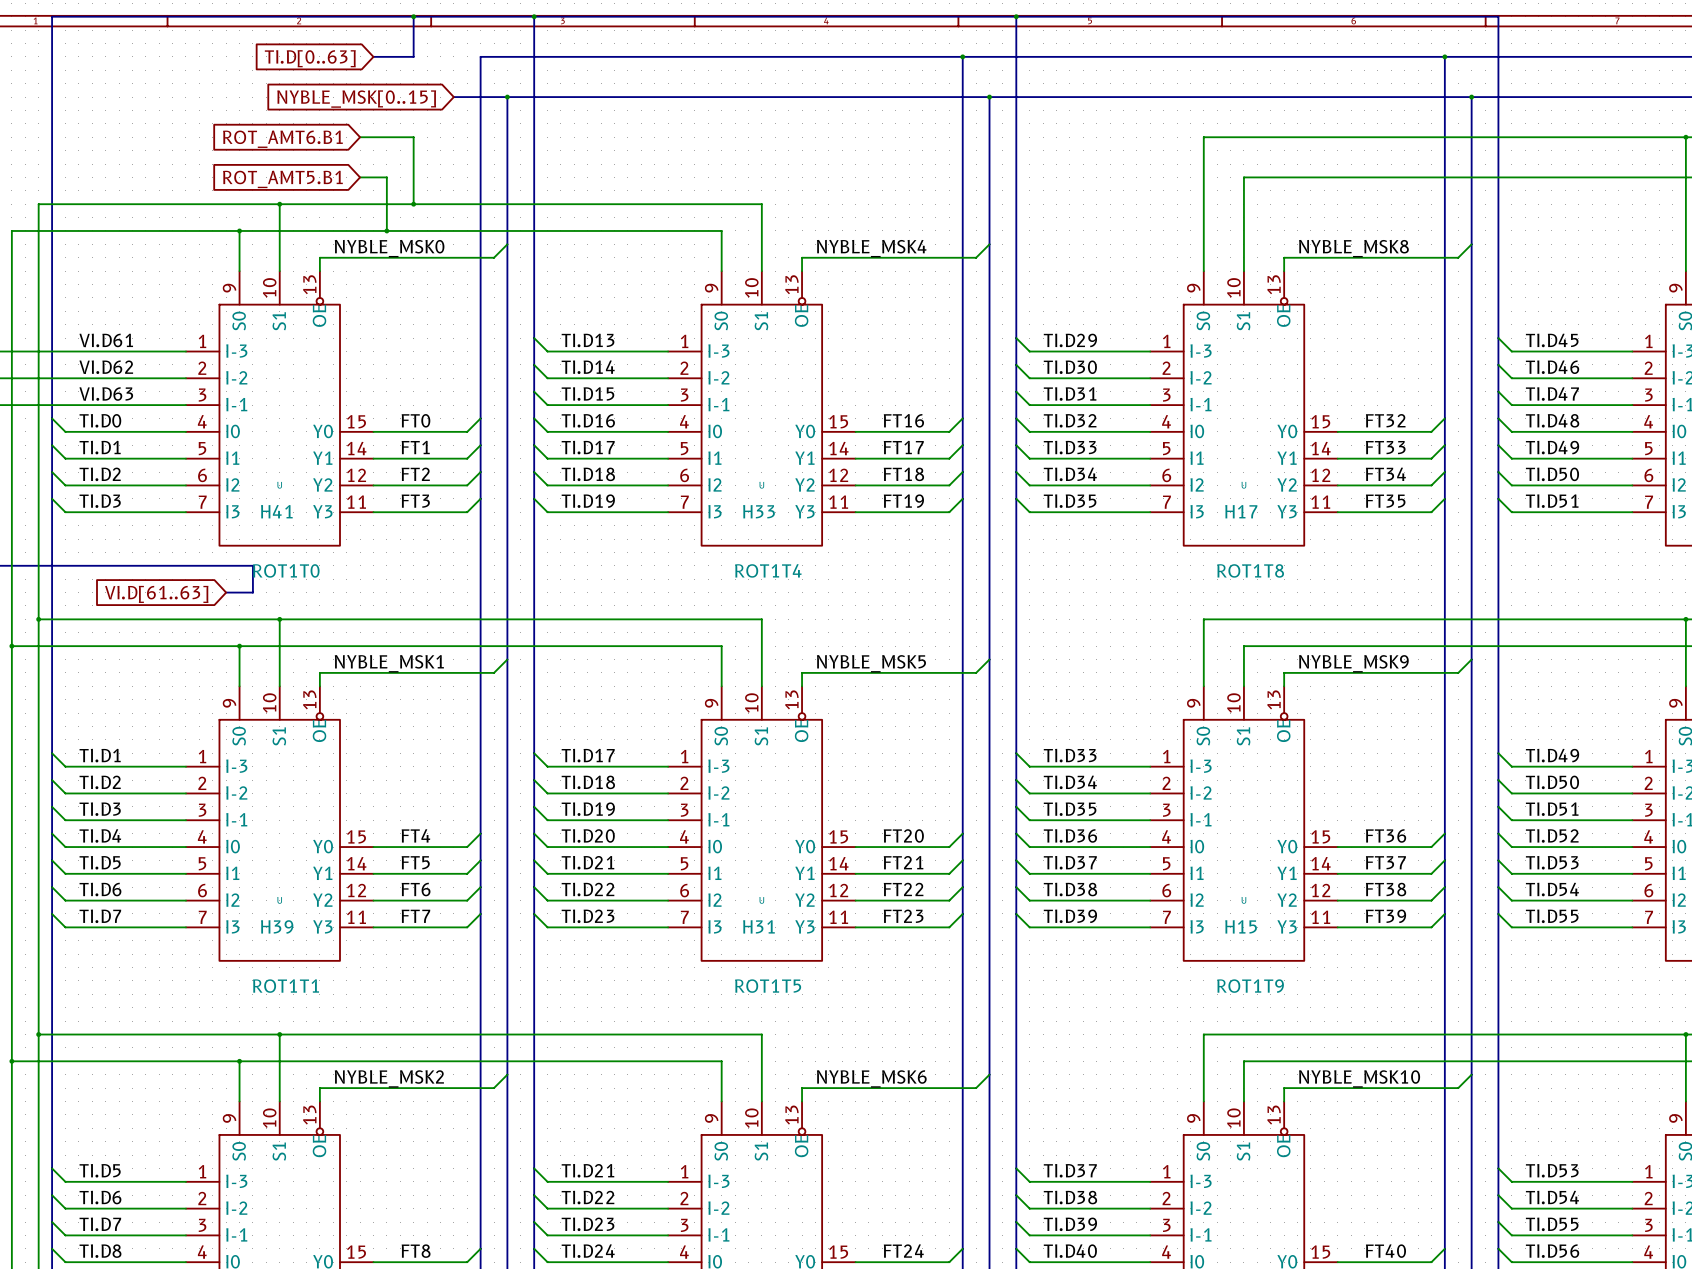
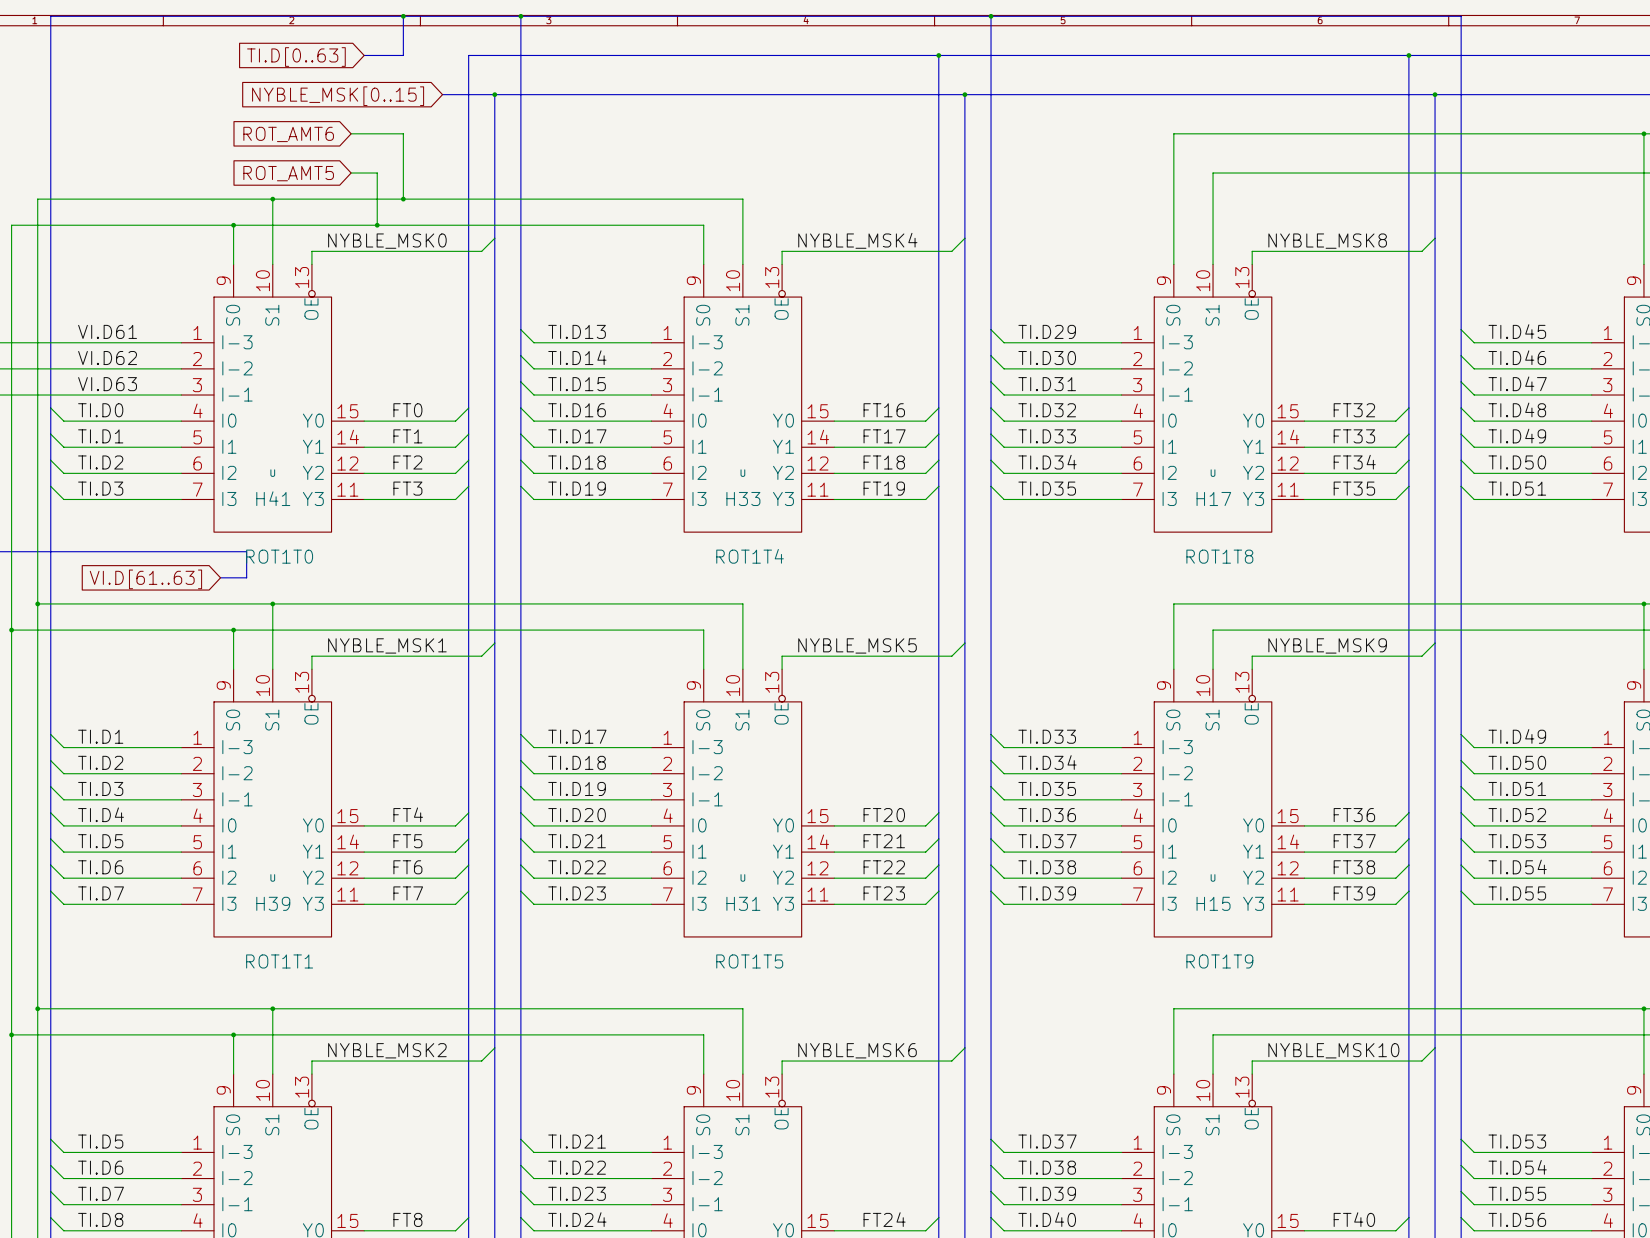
global label: ROT_AMT6.B1 (282, 139) -> ROT_AMT6 (288, 134)
global label: ROT_AMT5.B1 (282, 179) -> ROT_AMT5 (288, 173)

